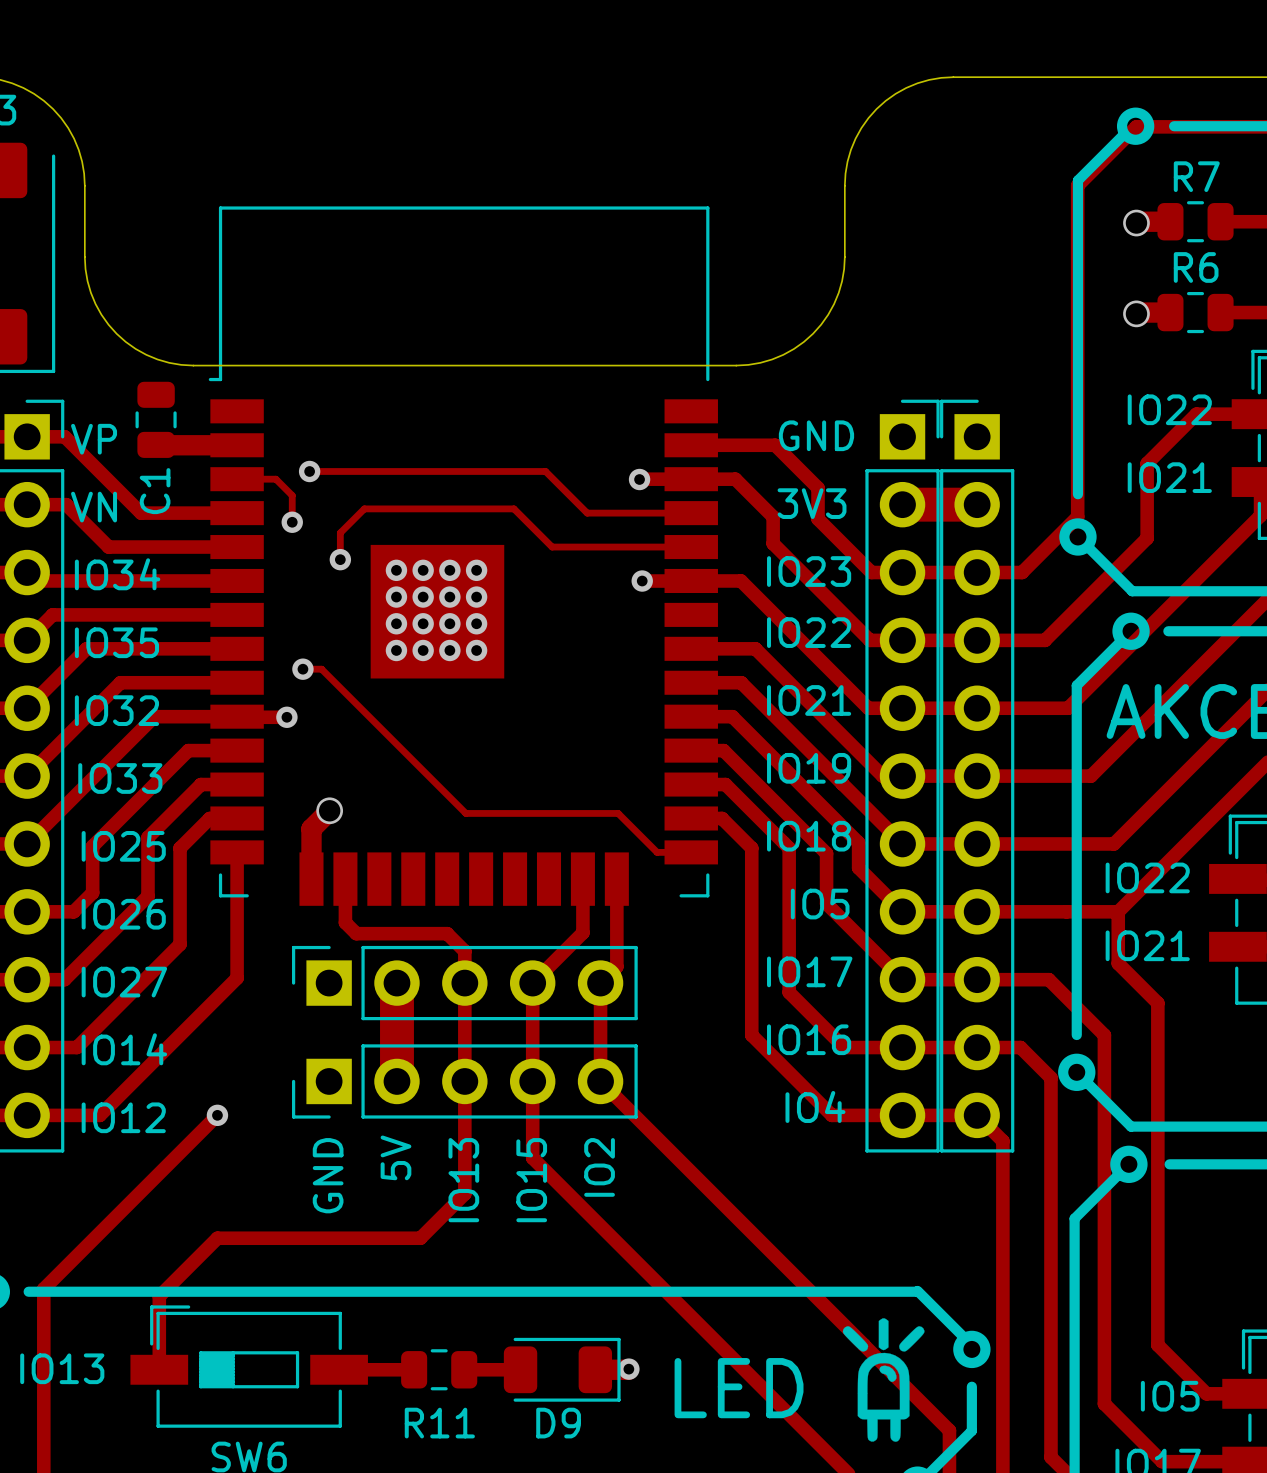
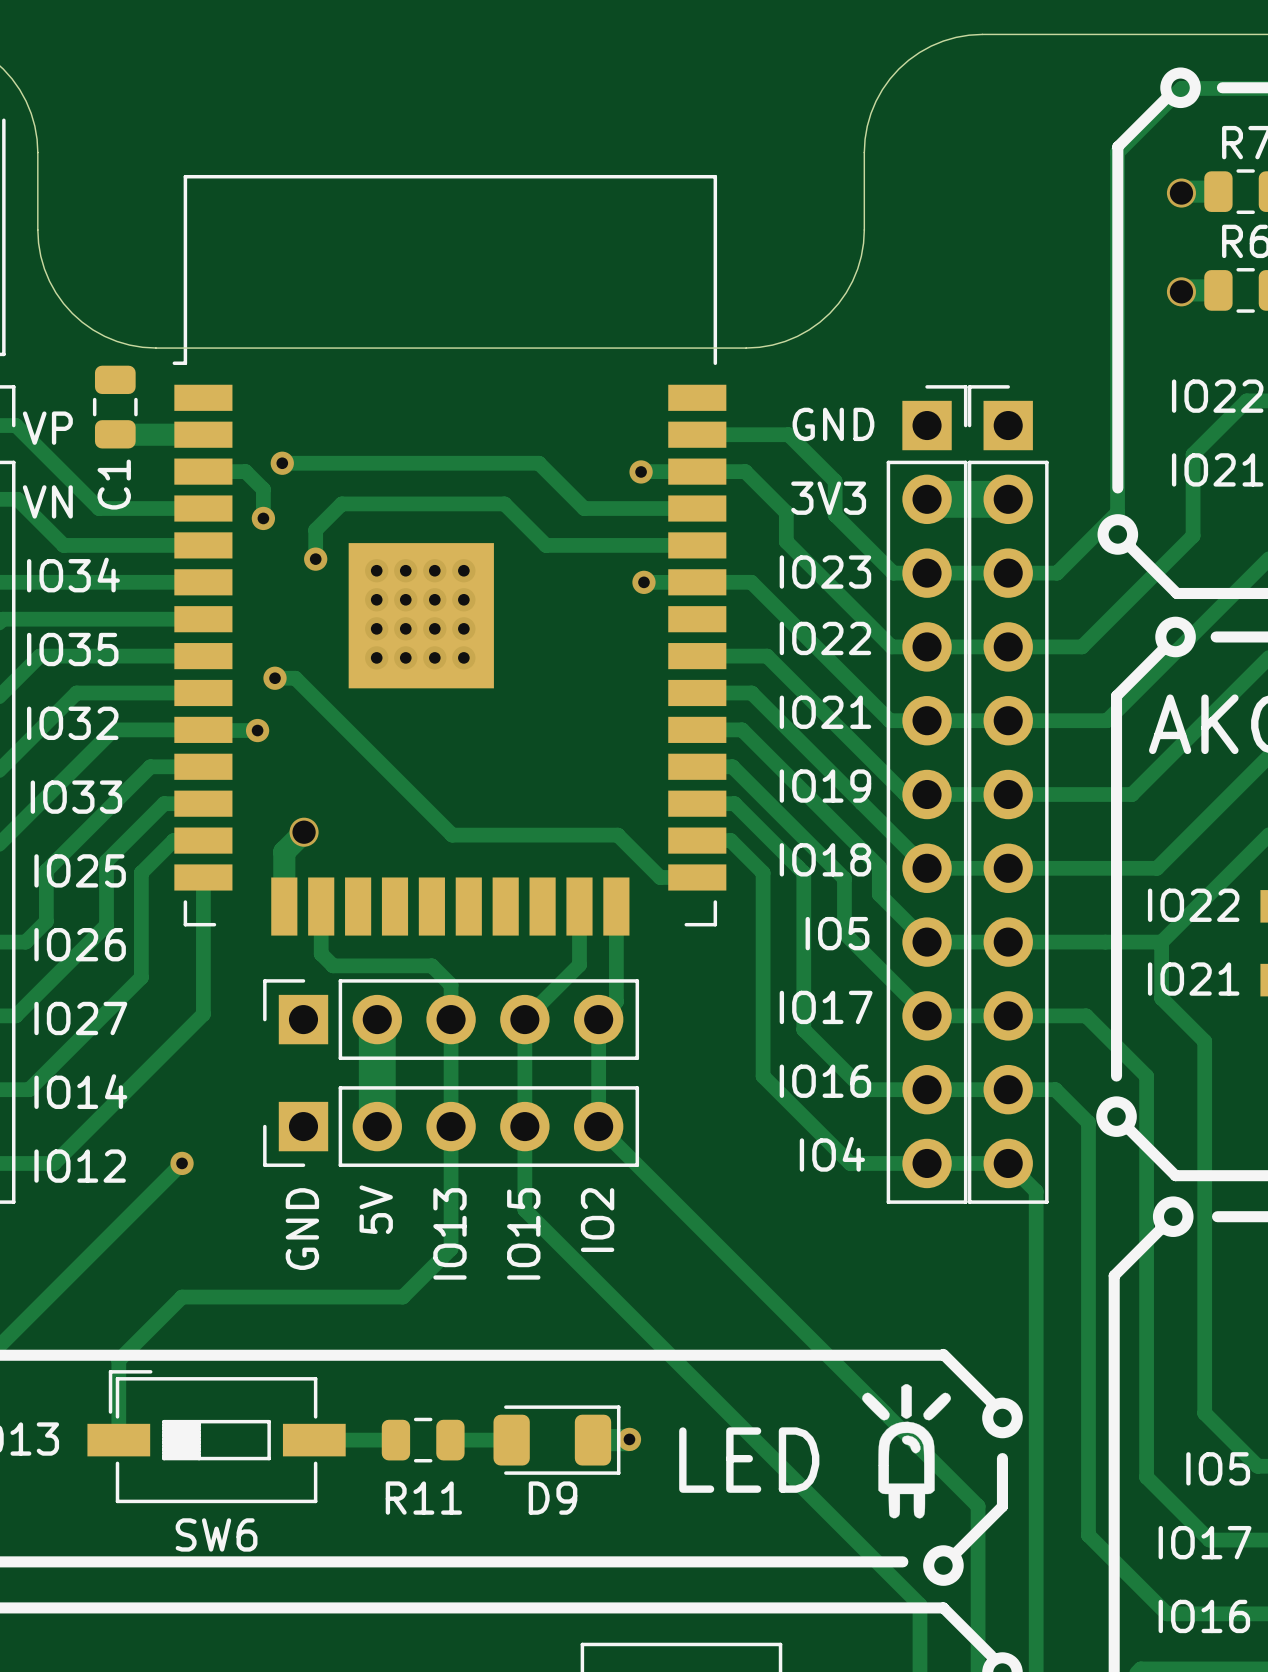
track width: thin (309, 471) (545, 471) (587, 513) (691, 513) -> thick (282, 463) (538, 463) (584, 508) (697, 508)
track width: thin (237, 479) (275, 479) (292, 495) (292, 522) -> thick (203, 471) (245, 471) (263, 489) (263, 518)
track width: thin (691, 547) (552, 547) (513, 508) (364, 508) (340, 532) (340, 559) -> thick (697, 545) (546, 545) (504, 503) (341, 503) (315, 530) (315, 559)
track width: thin (302, 669) (321, 669) (465, 813) (618, 813) (657, 852) (691, 852) -> thick (275, 678) (295, 678) (452, 835) (617, 835) (660, 877) (697, 877)

